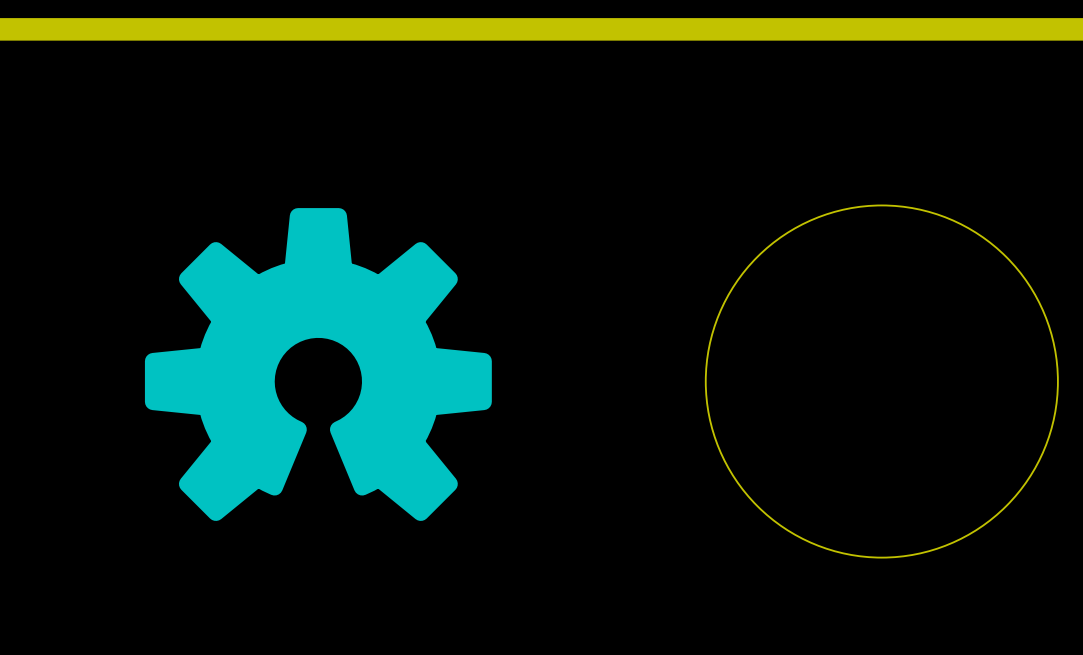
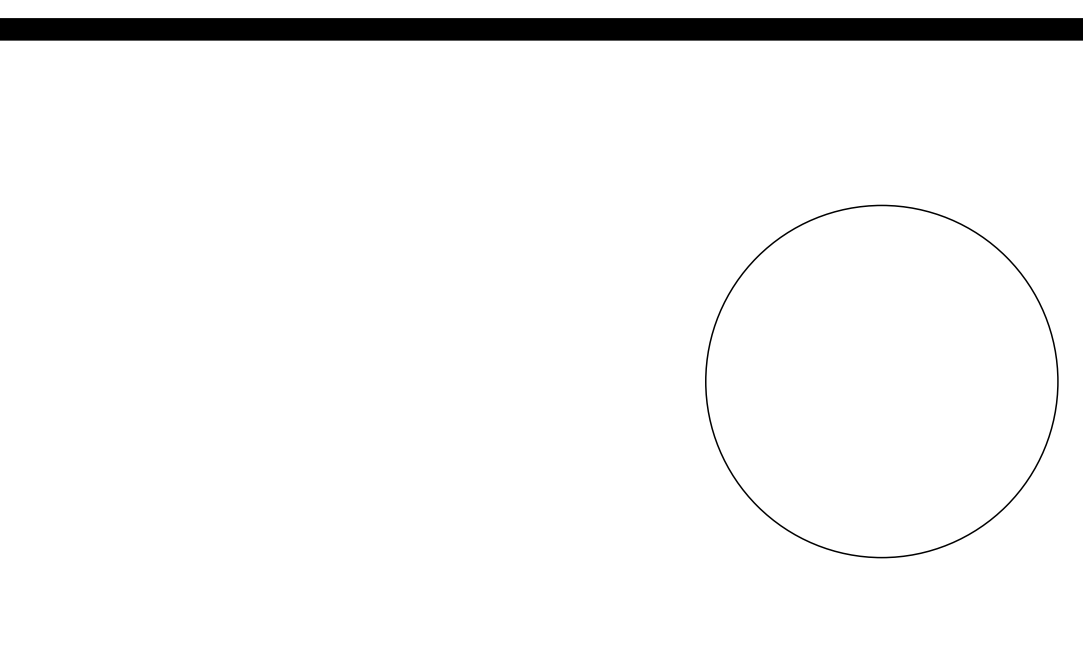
drawing: [144, 208, 492, 521] -> none

